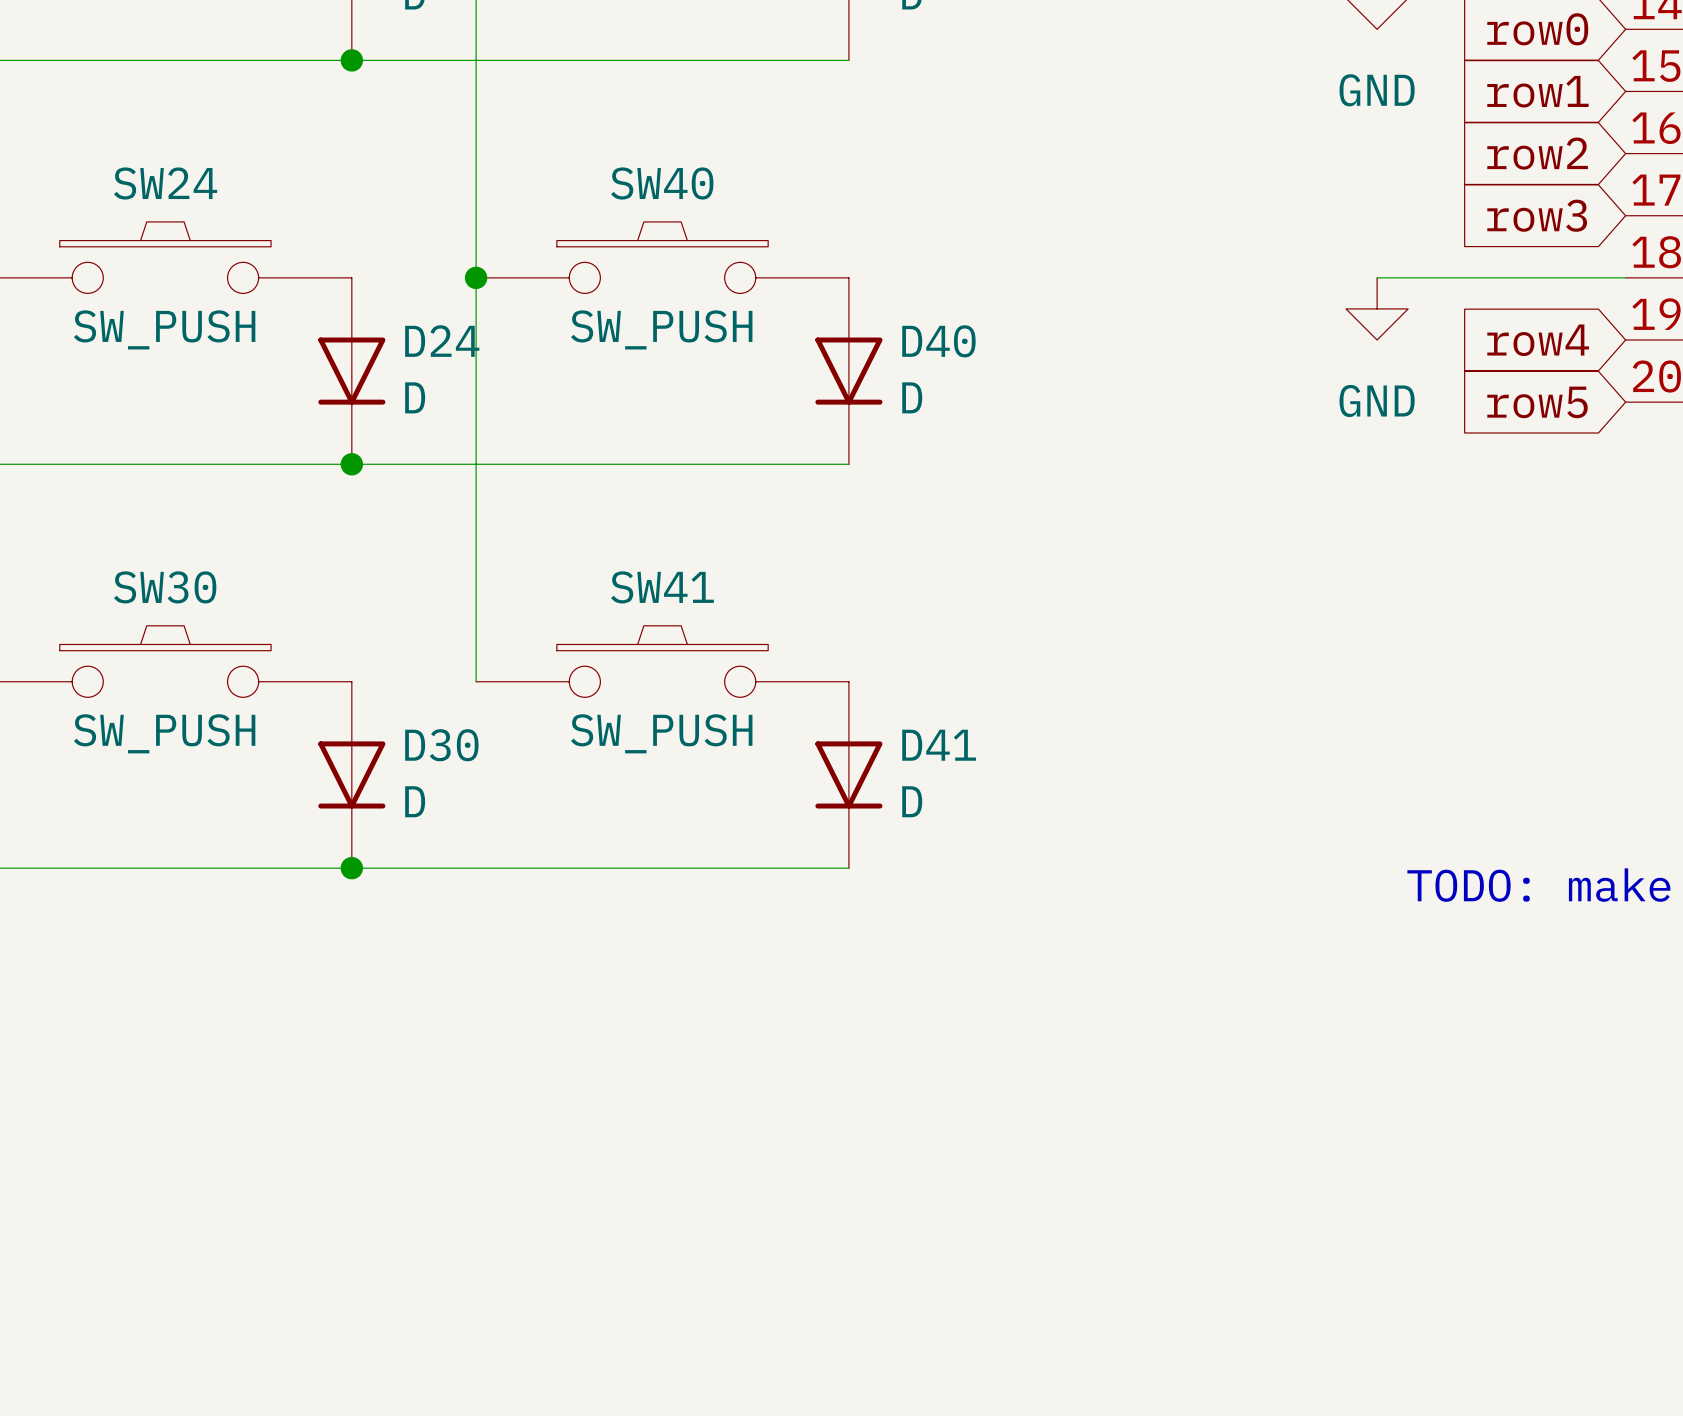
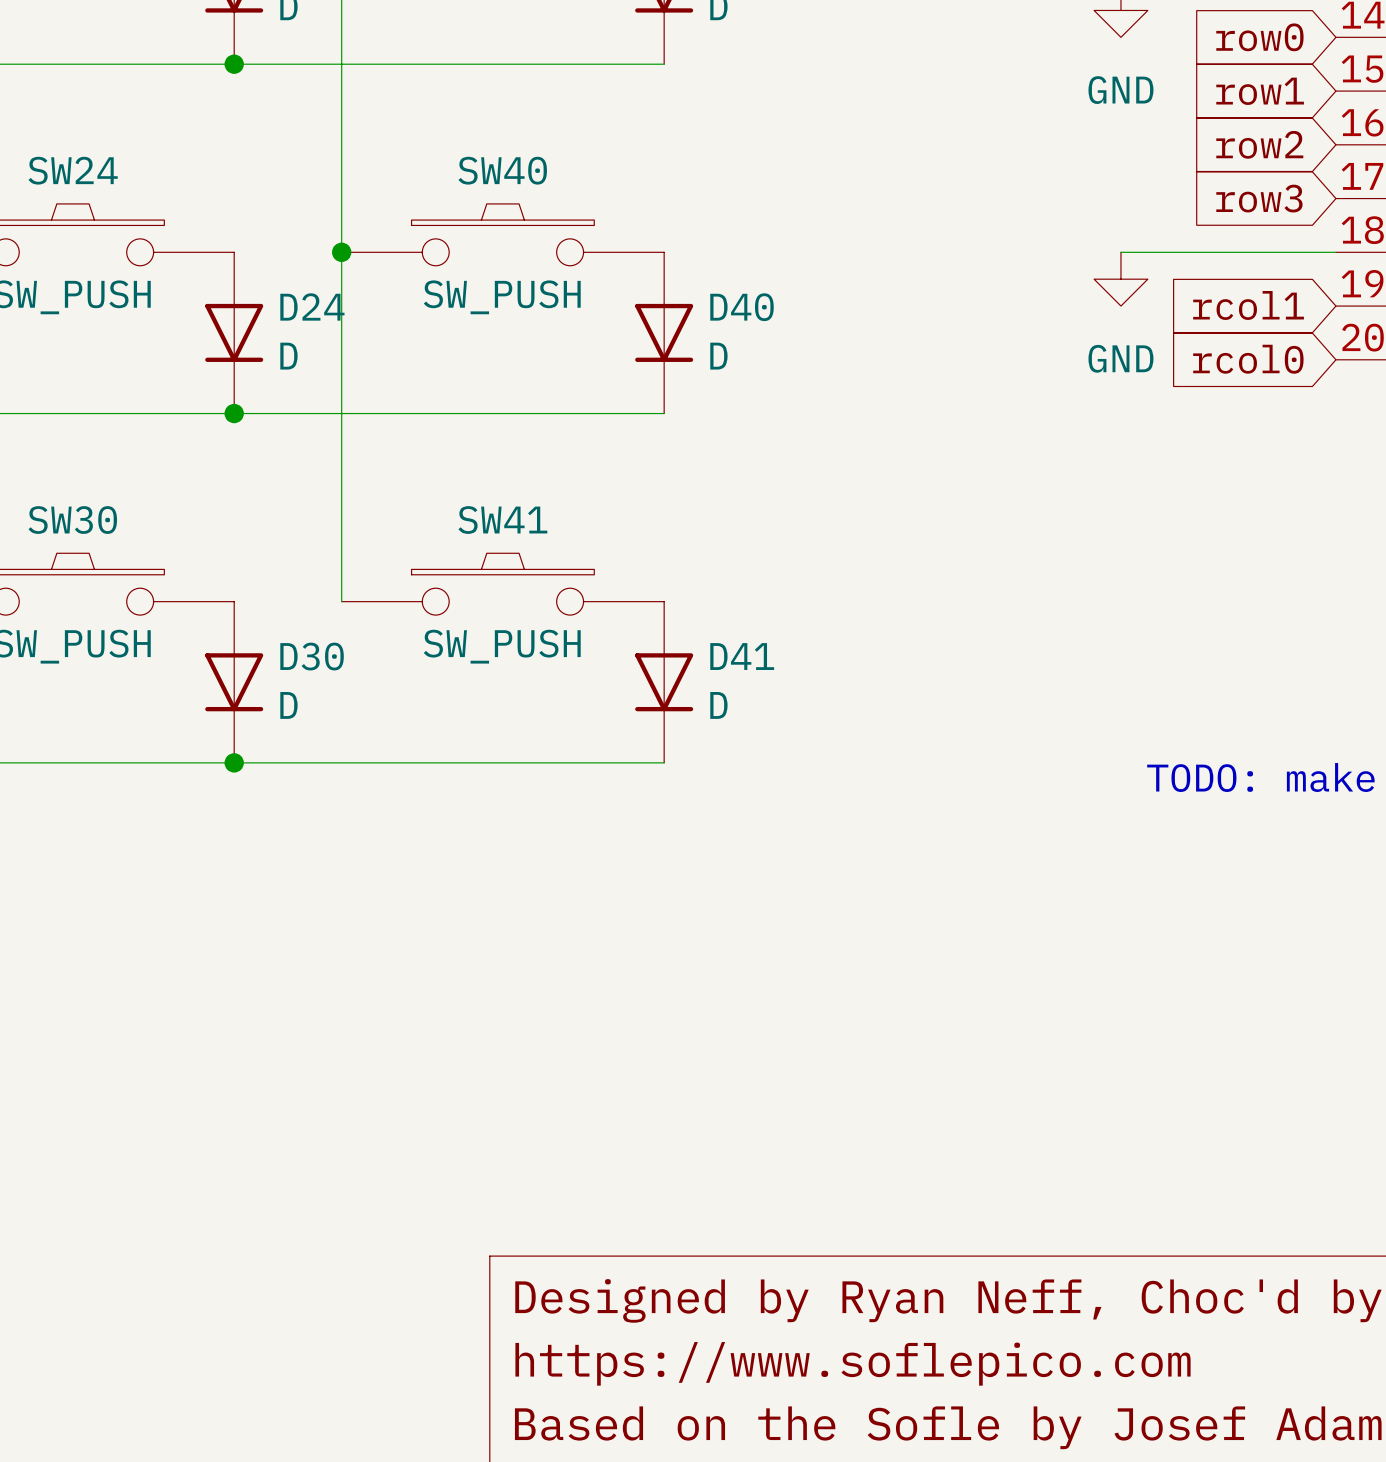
global label: row4 (1538, 340) -> rcol1 (1248, 305)
global label: row5 (1537, 402) -> rcol0 (1248, 359)

